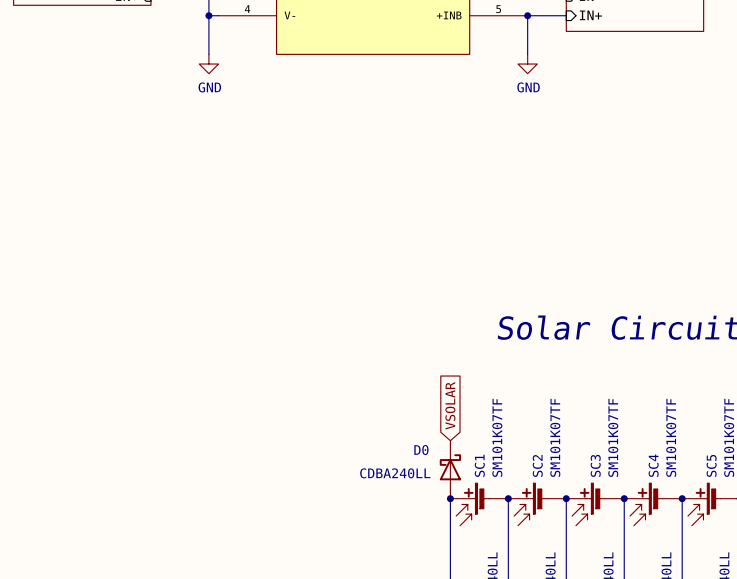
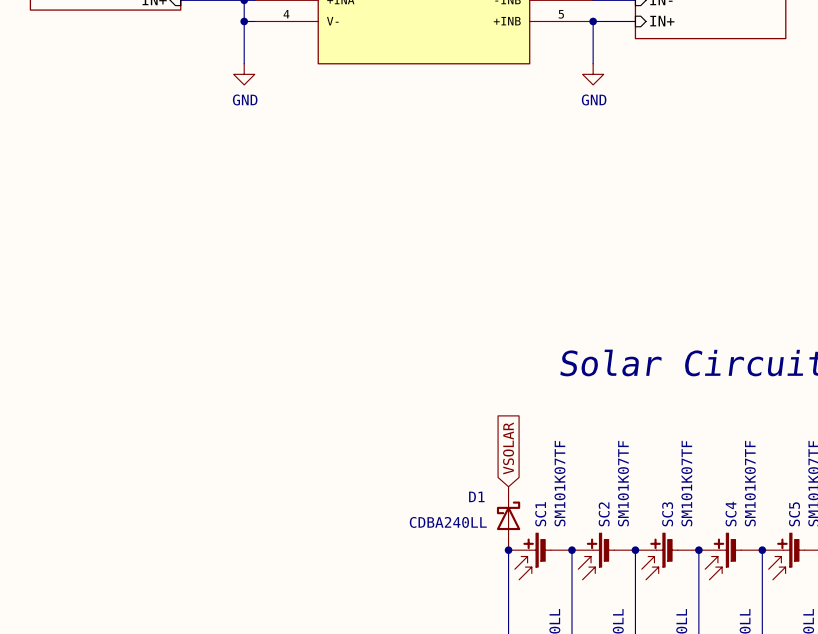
D0 name: D0 (421, 450) -> D1 (476, 496)

